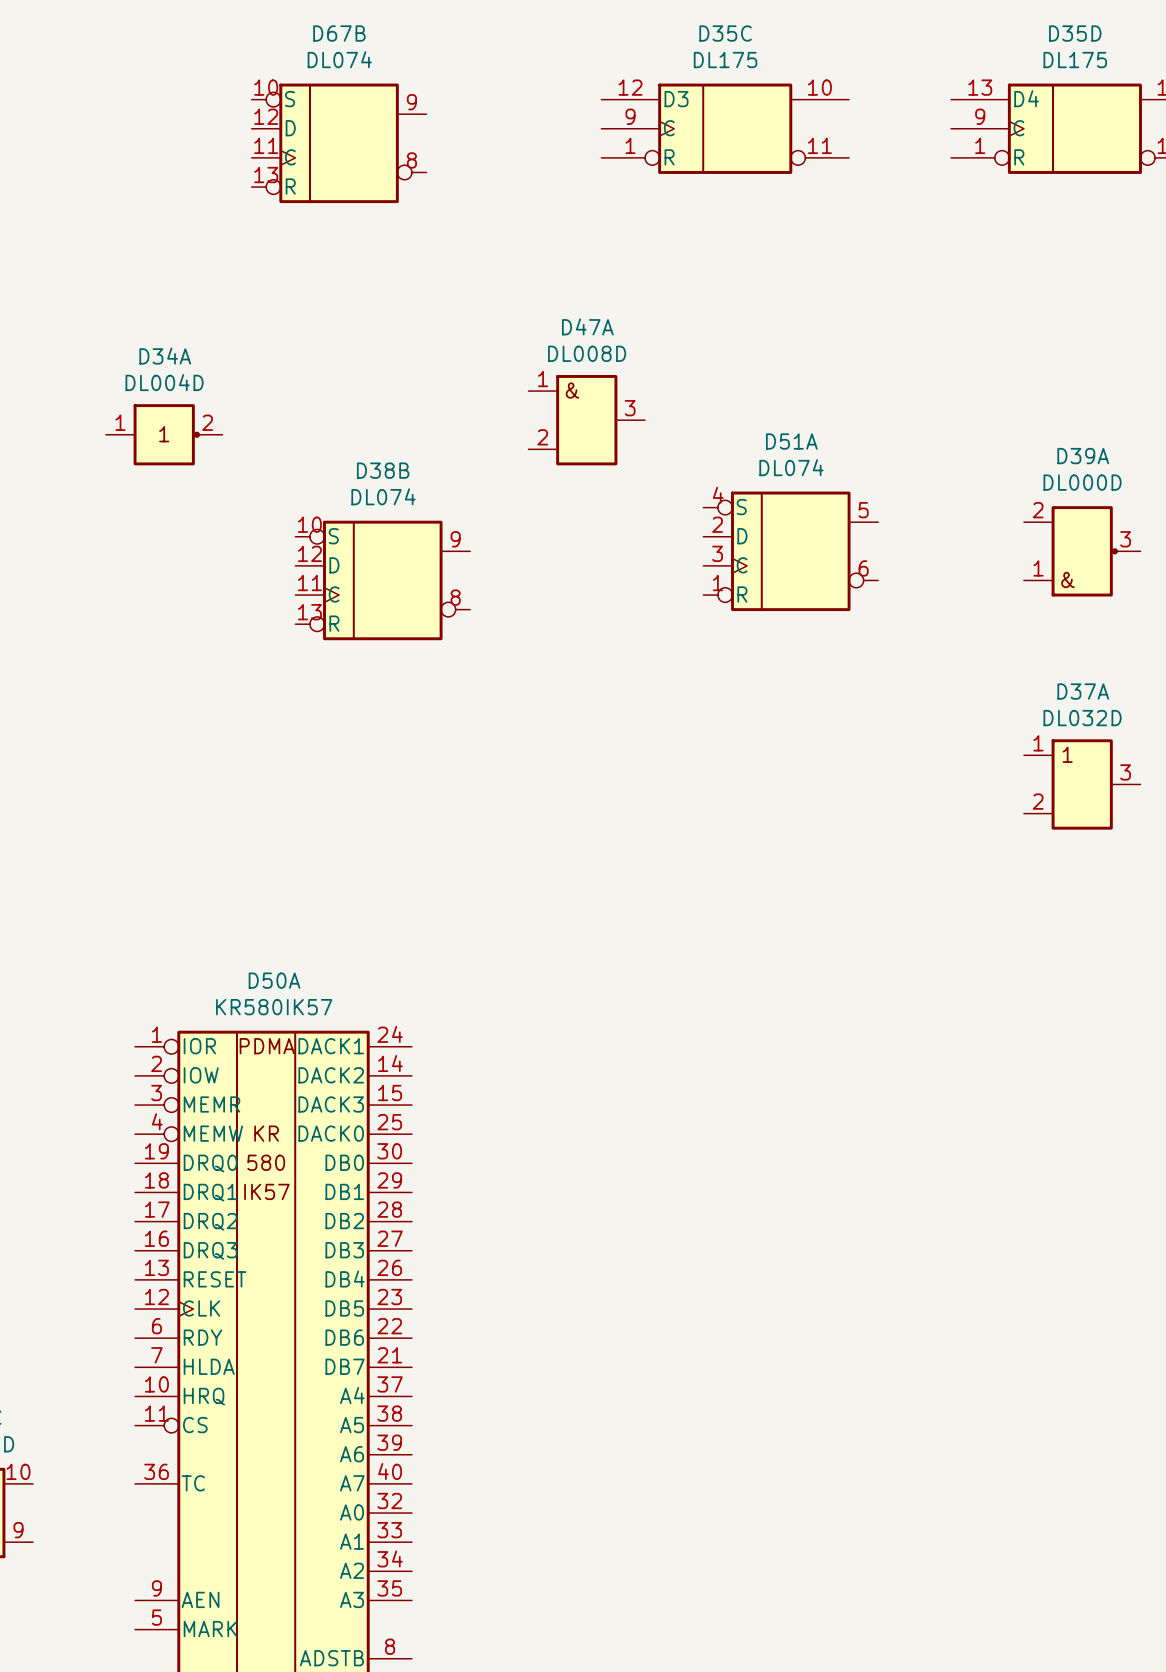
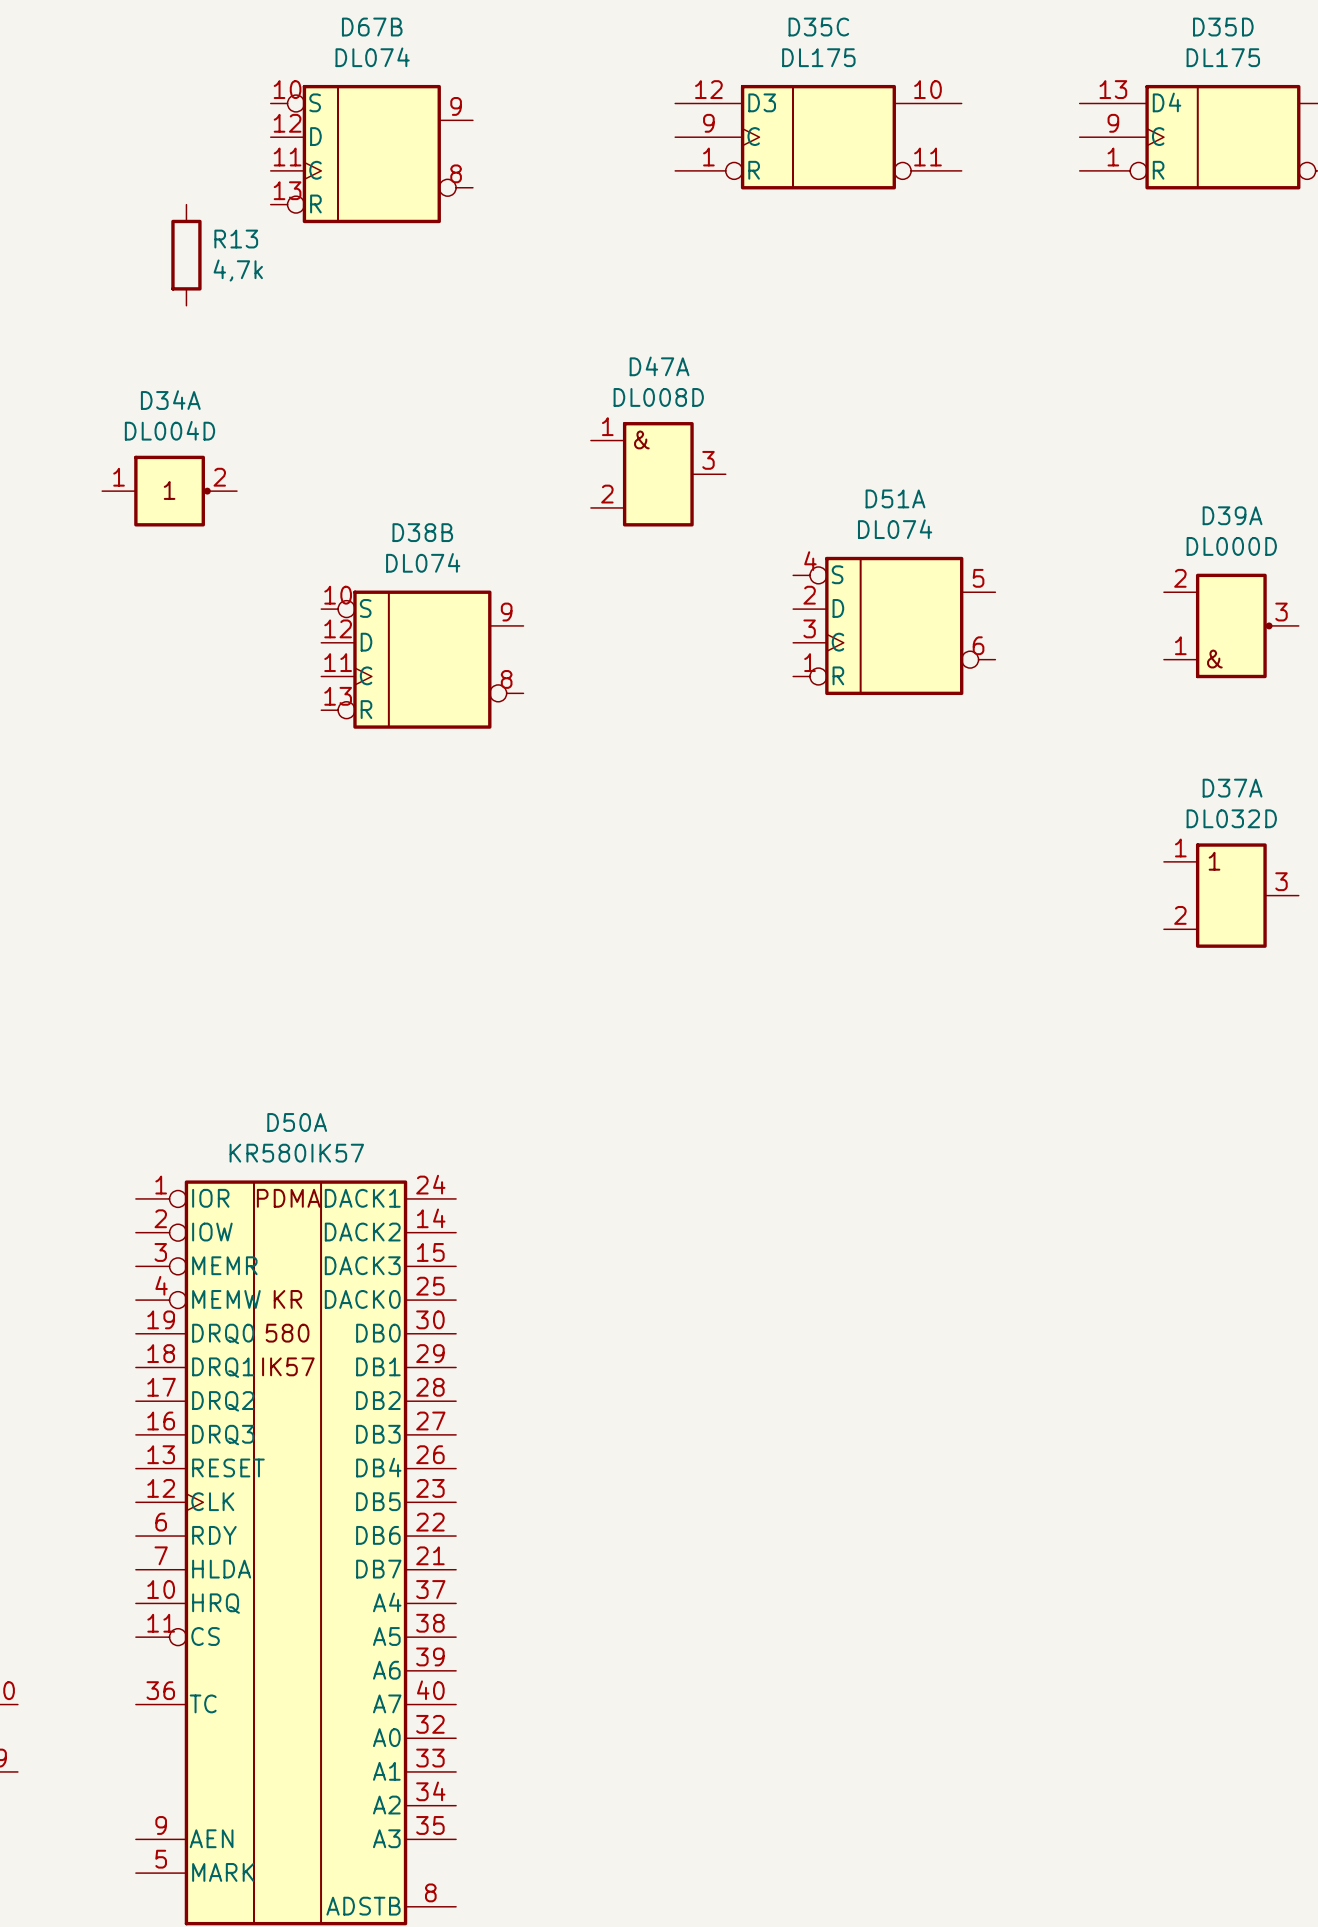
R13: none -> 4,7k (186, 255)

